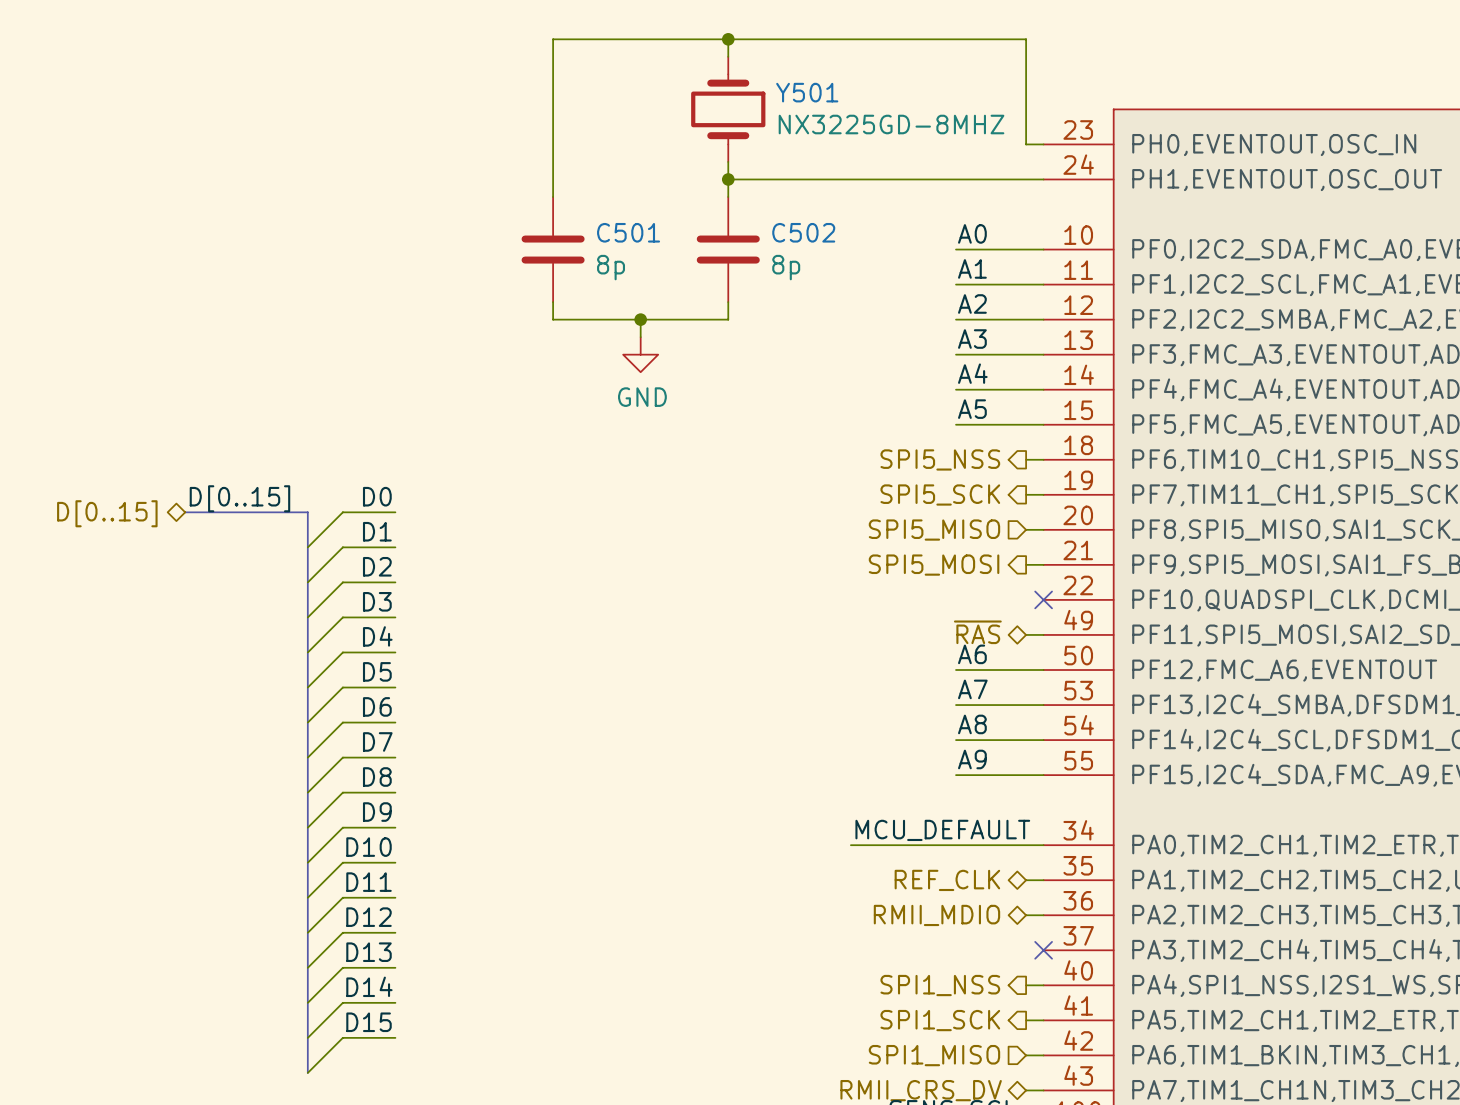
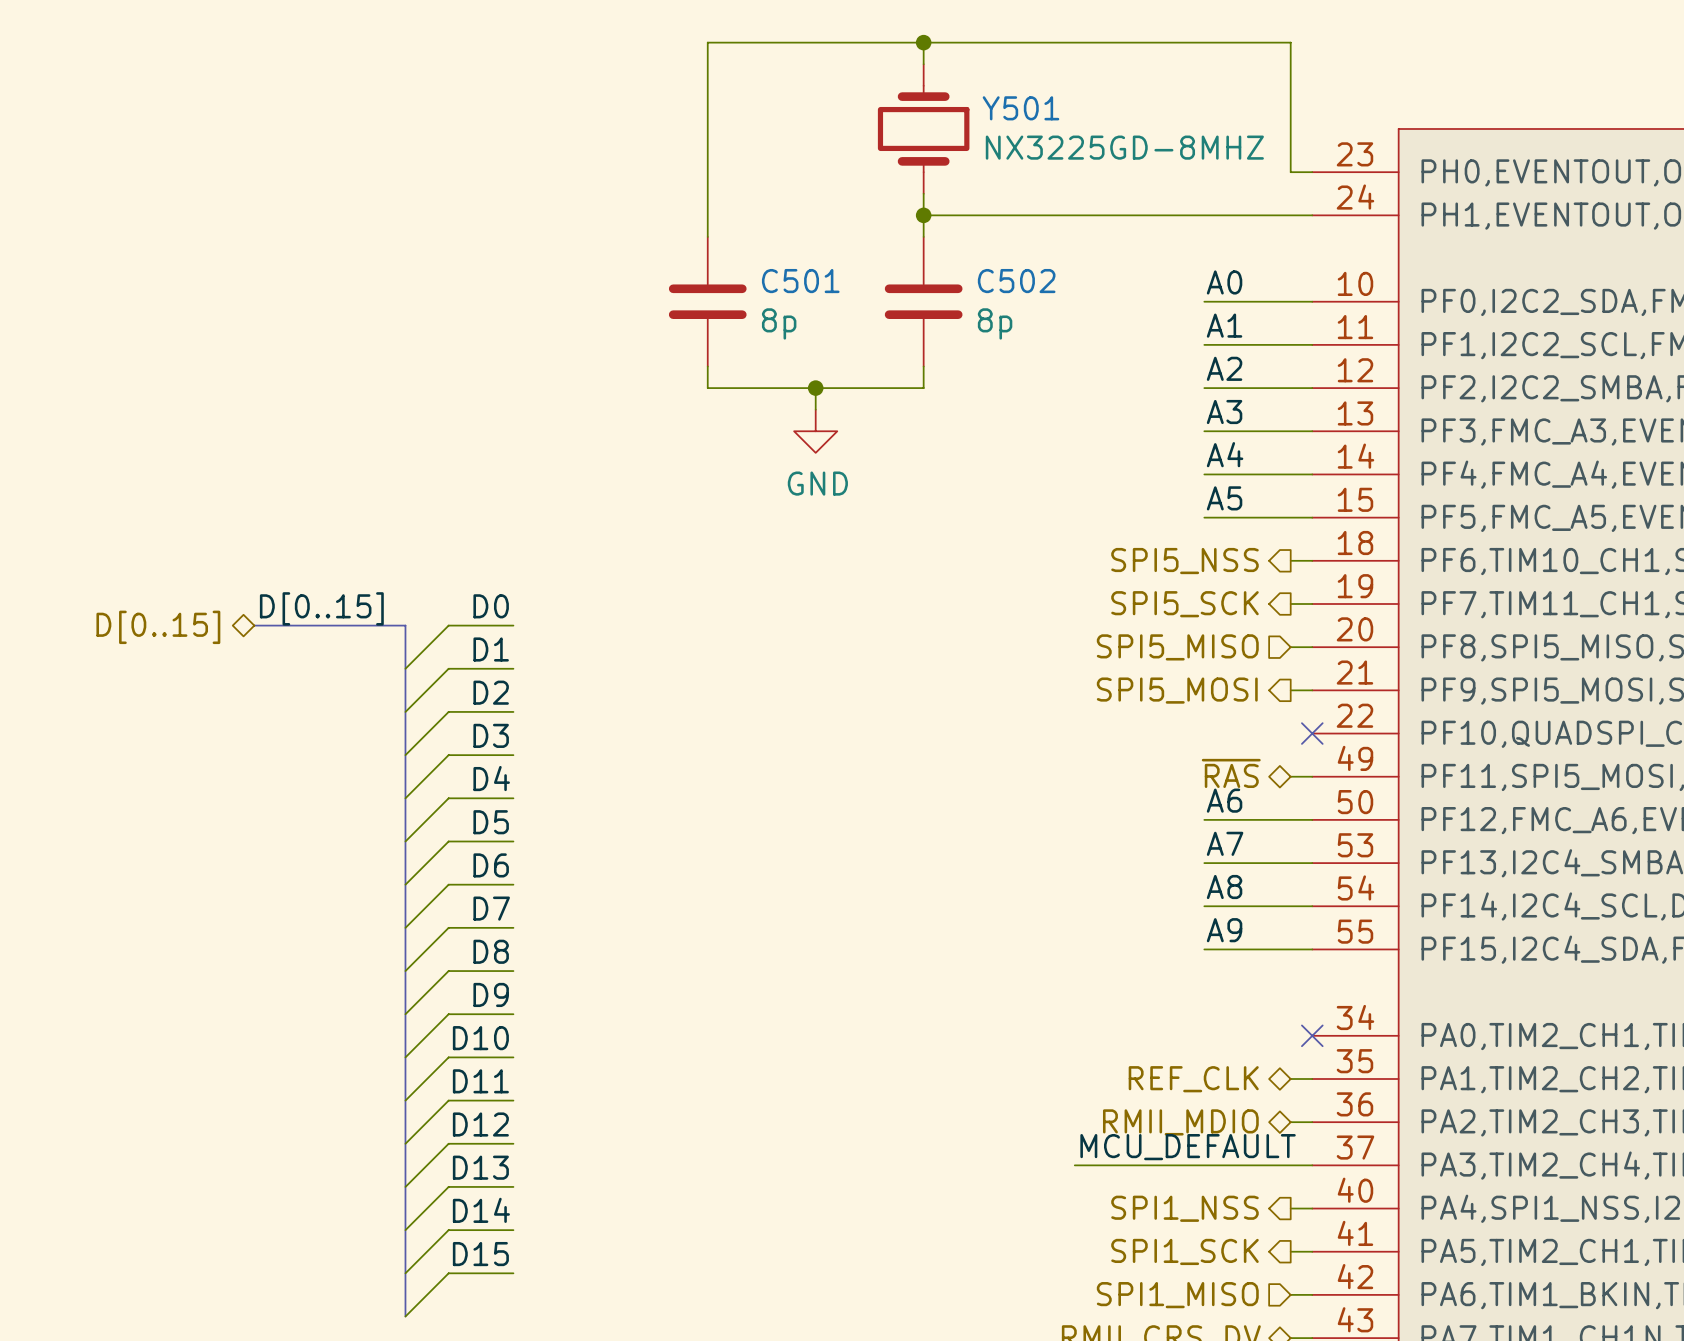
label position: MCU_DEFAULT (942, 830) -> MCU_DEFAULT (1188, 1147)
wire: (850, 845) (1043, 845) -> (1074, 1165) (1312, 1165)
no-connect mark: none -> (1312, 1035)
no-connect mark: (1043, 950) -> none

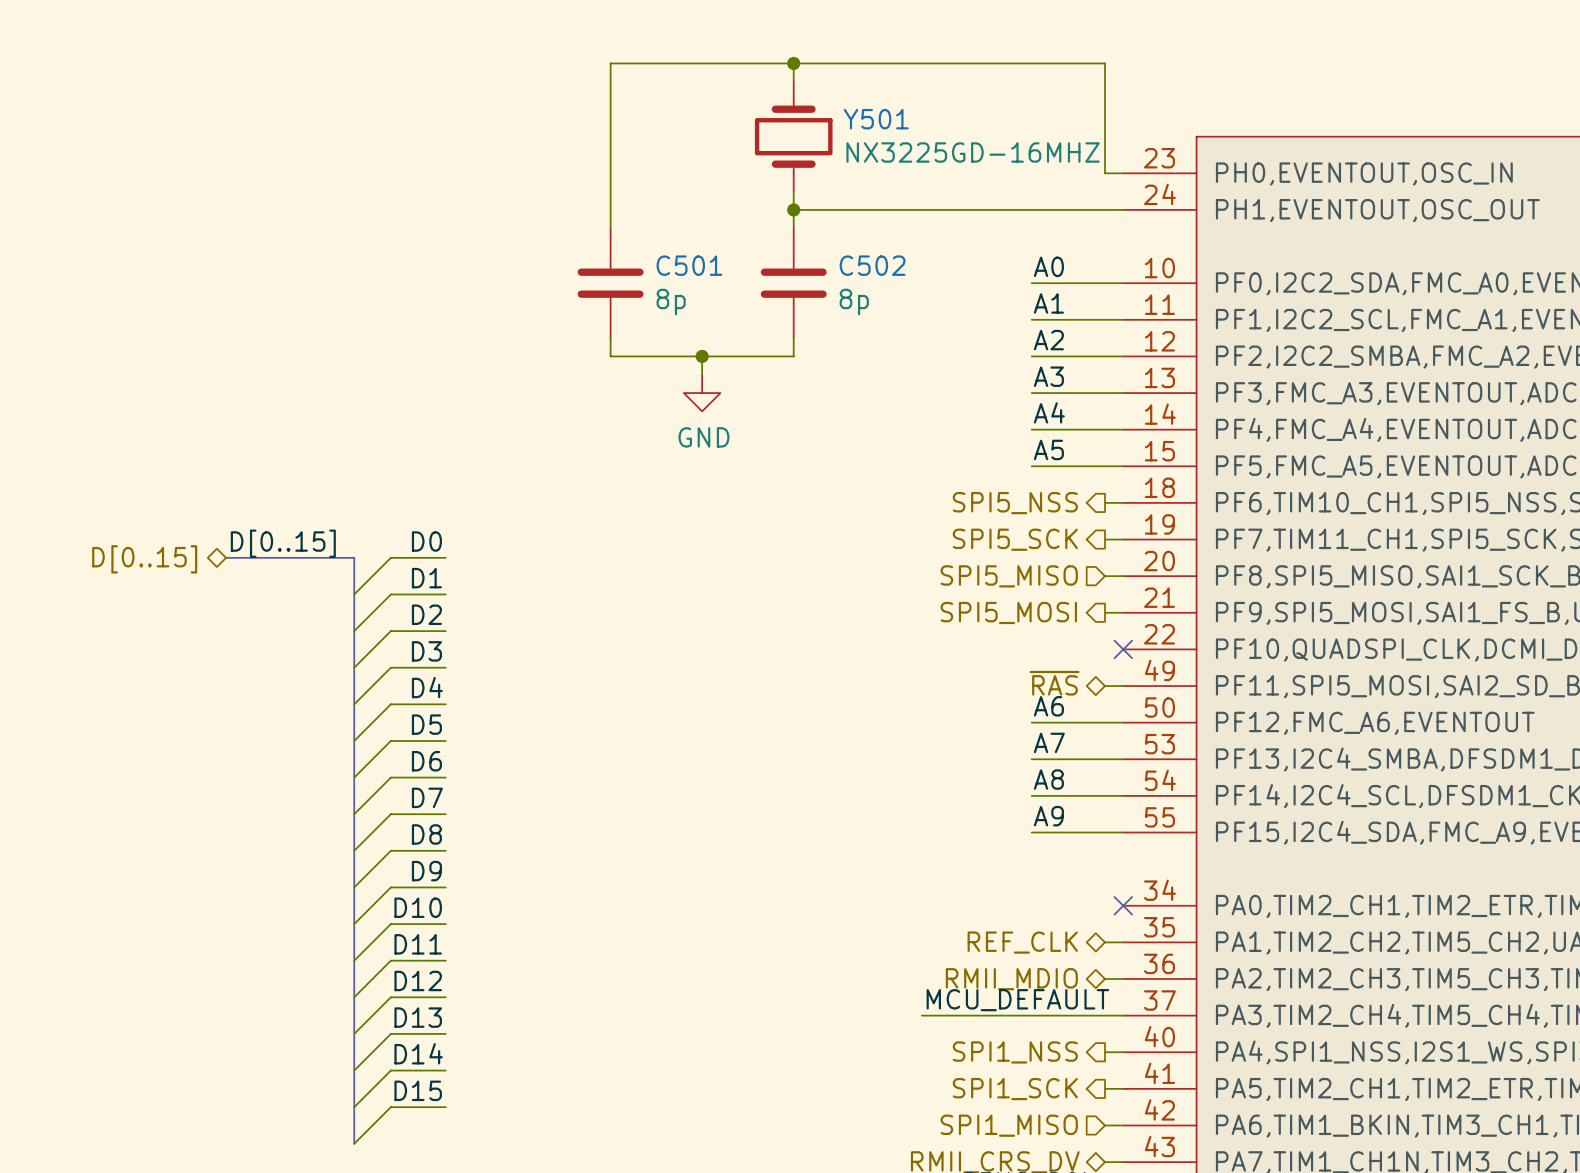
Y501 value: NX3225GD-8MHZ (1124, 147) -> NX3225GD-16MHZ (973, 152)

